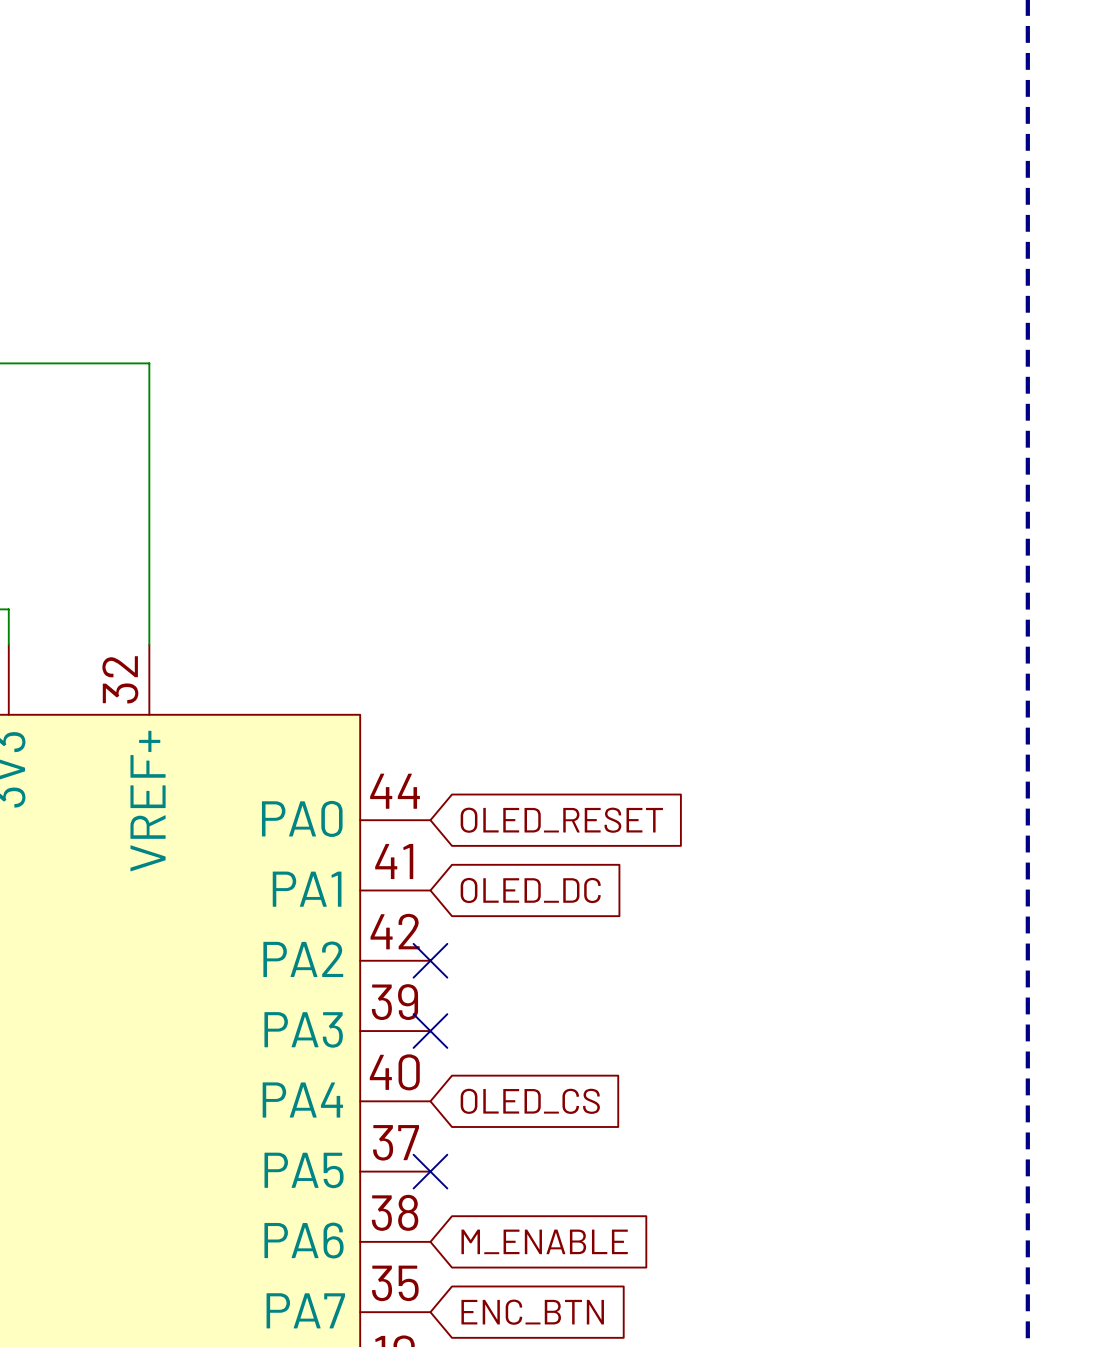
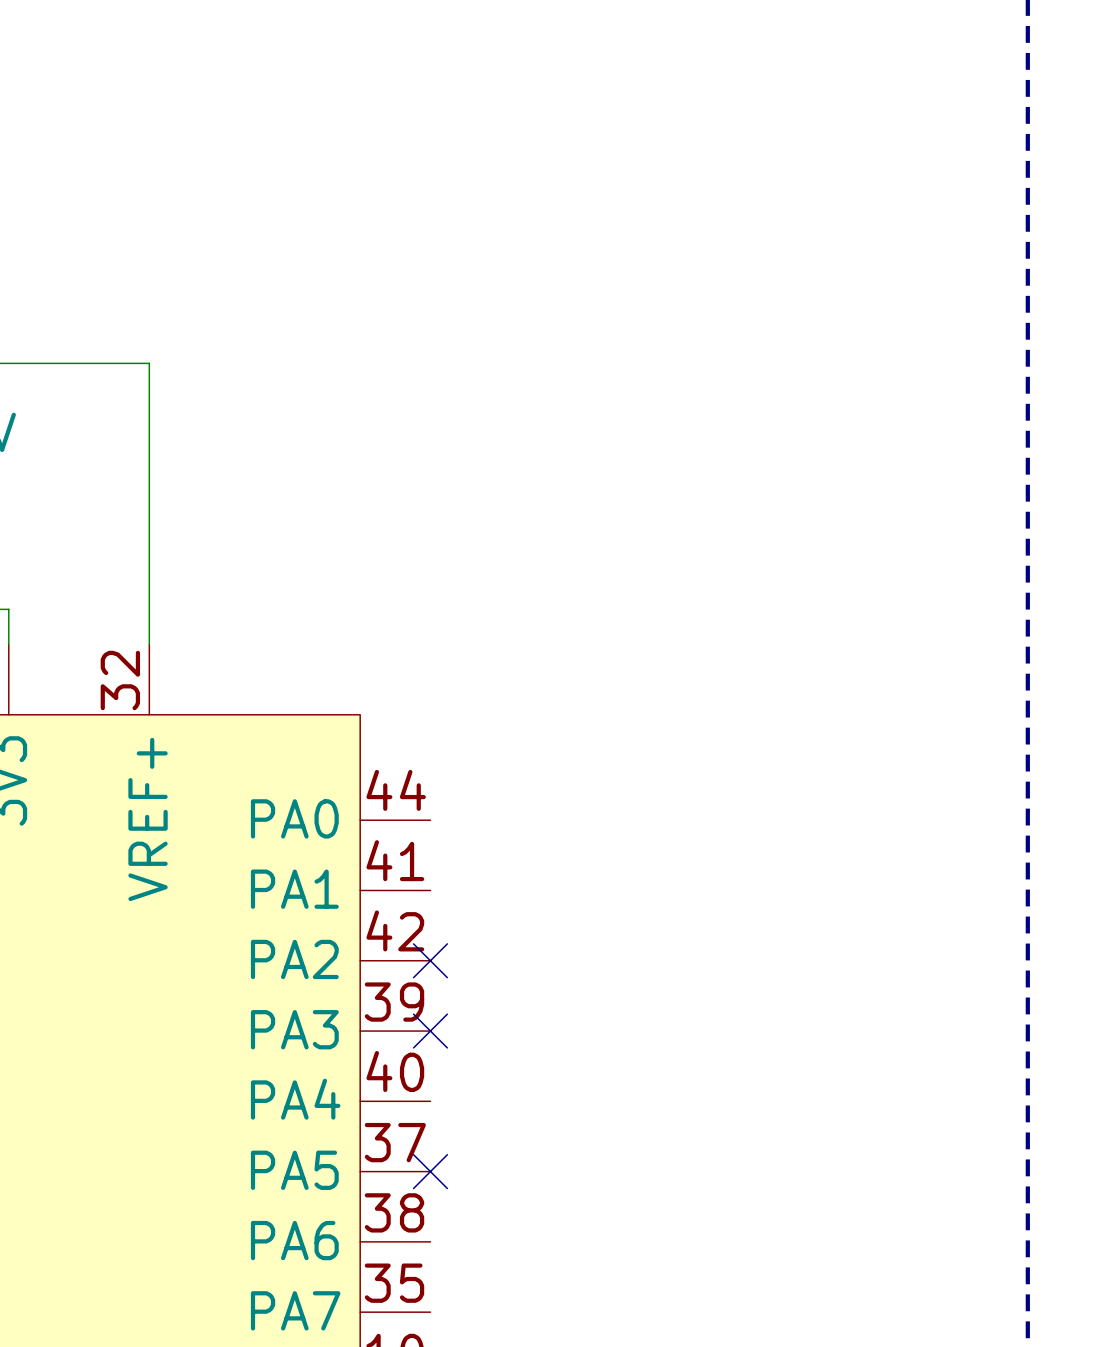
global label: OLED_RESET (561, 820) -> none
global label: OLED_DC (530, 890) -> none
global label: OLED_CS (530, 1101) -> none
global label: M_ENABLE (544, 1241) -> none
global label: ENC_BTN (532, 1312) -> none

